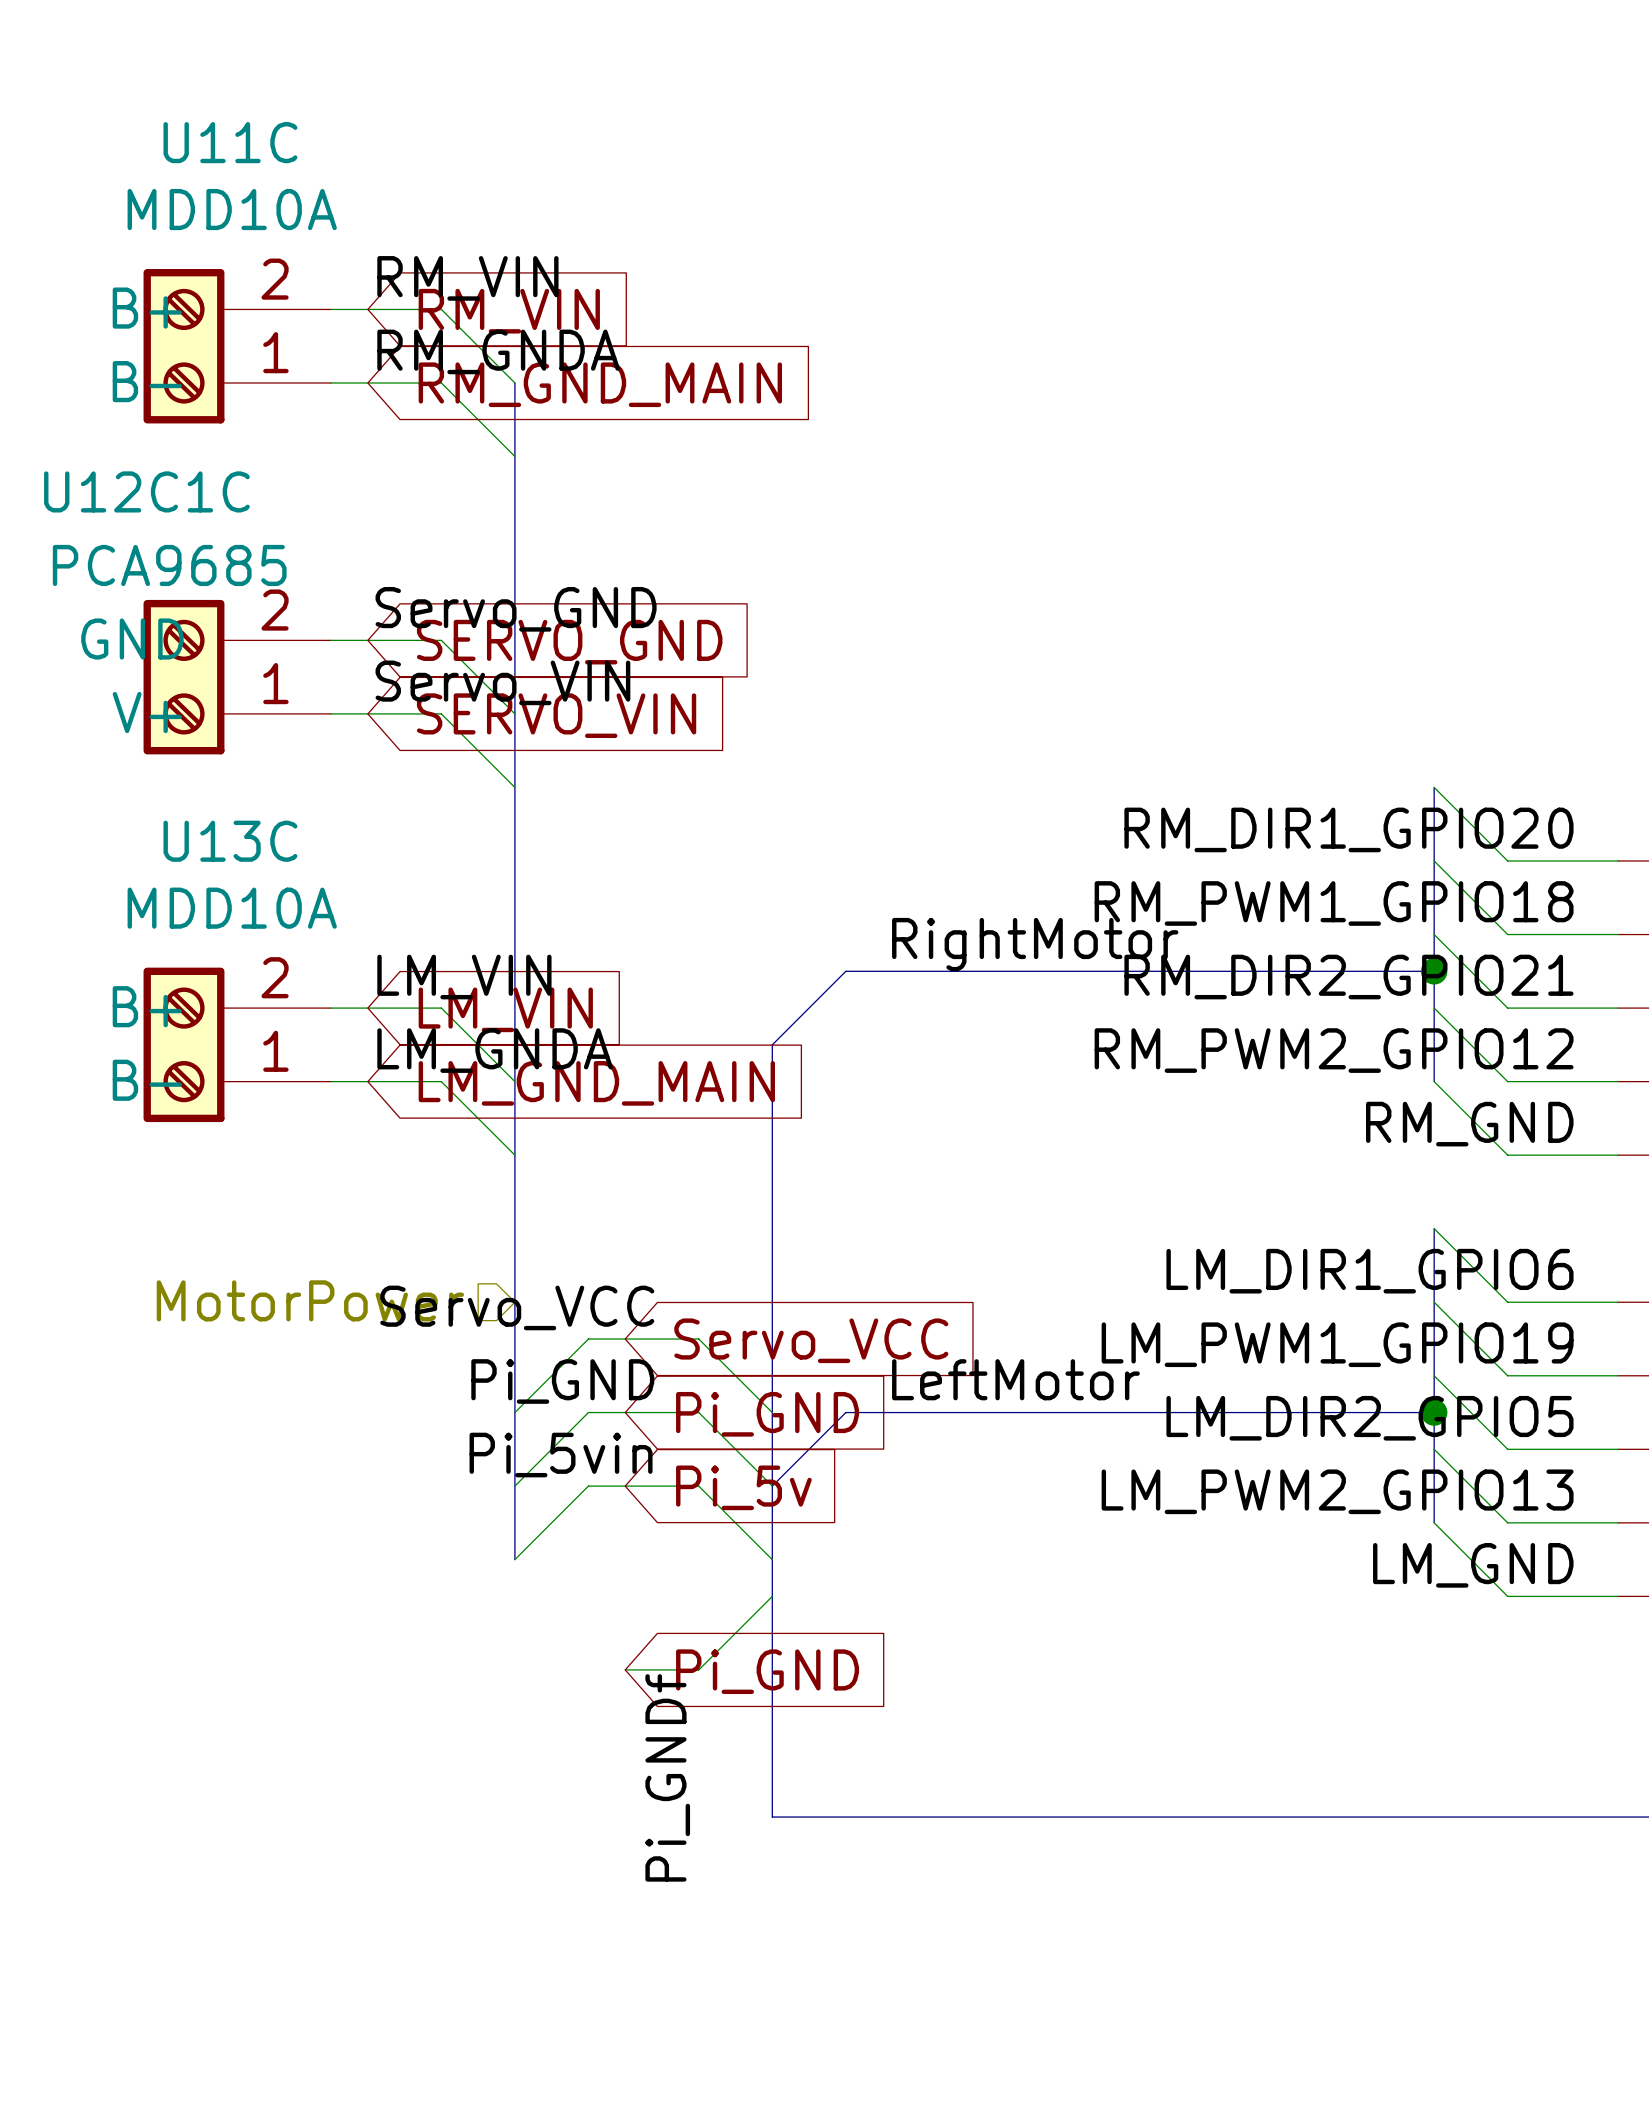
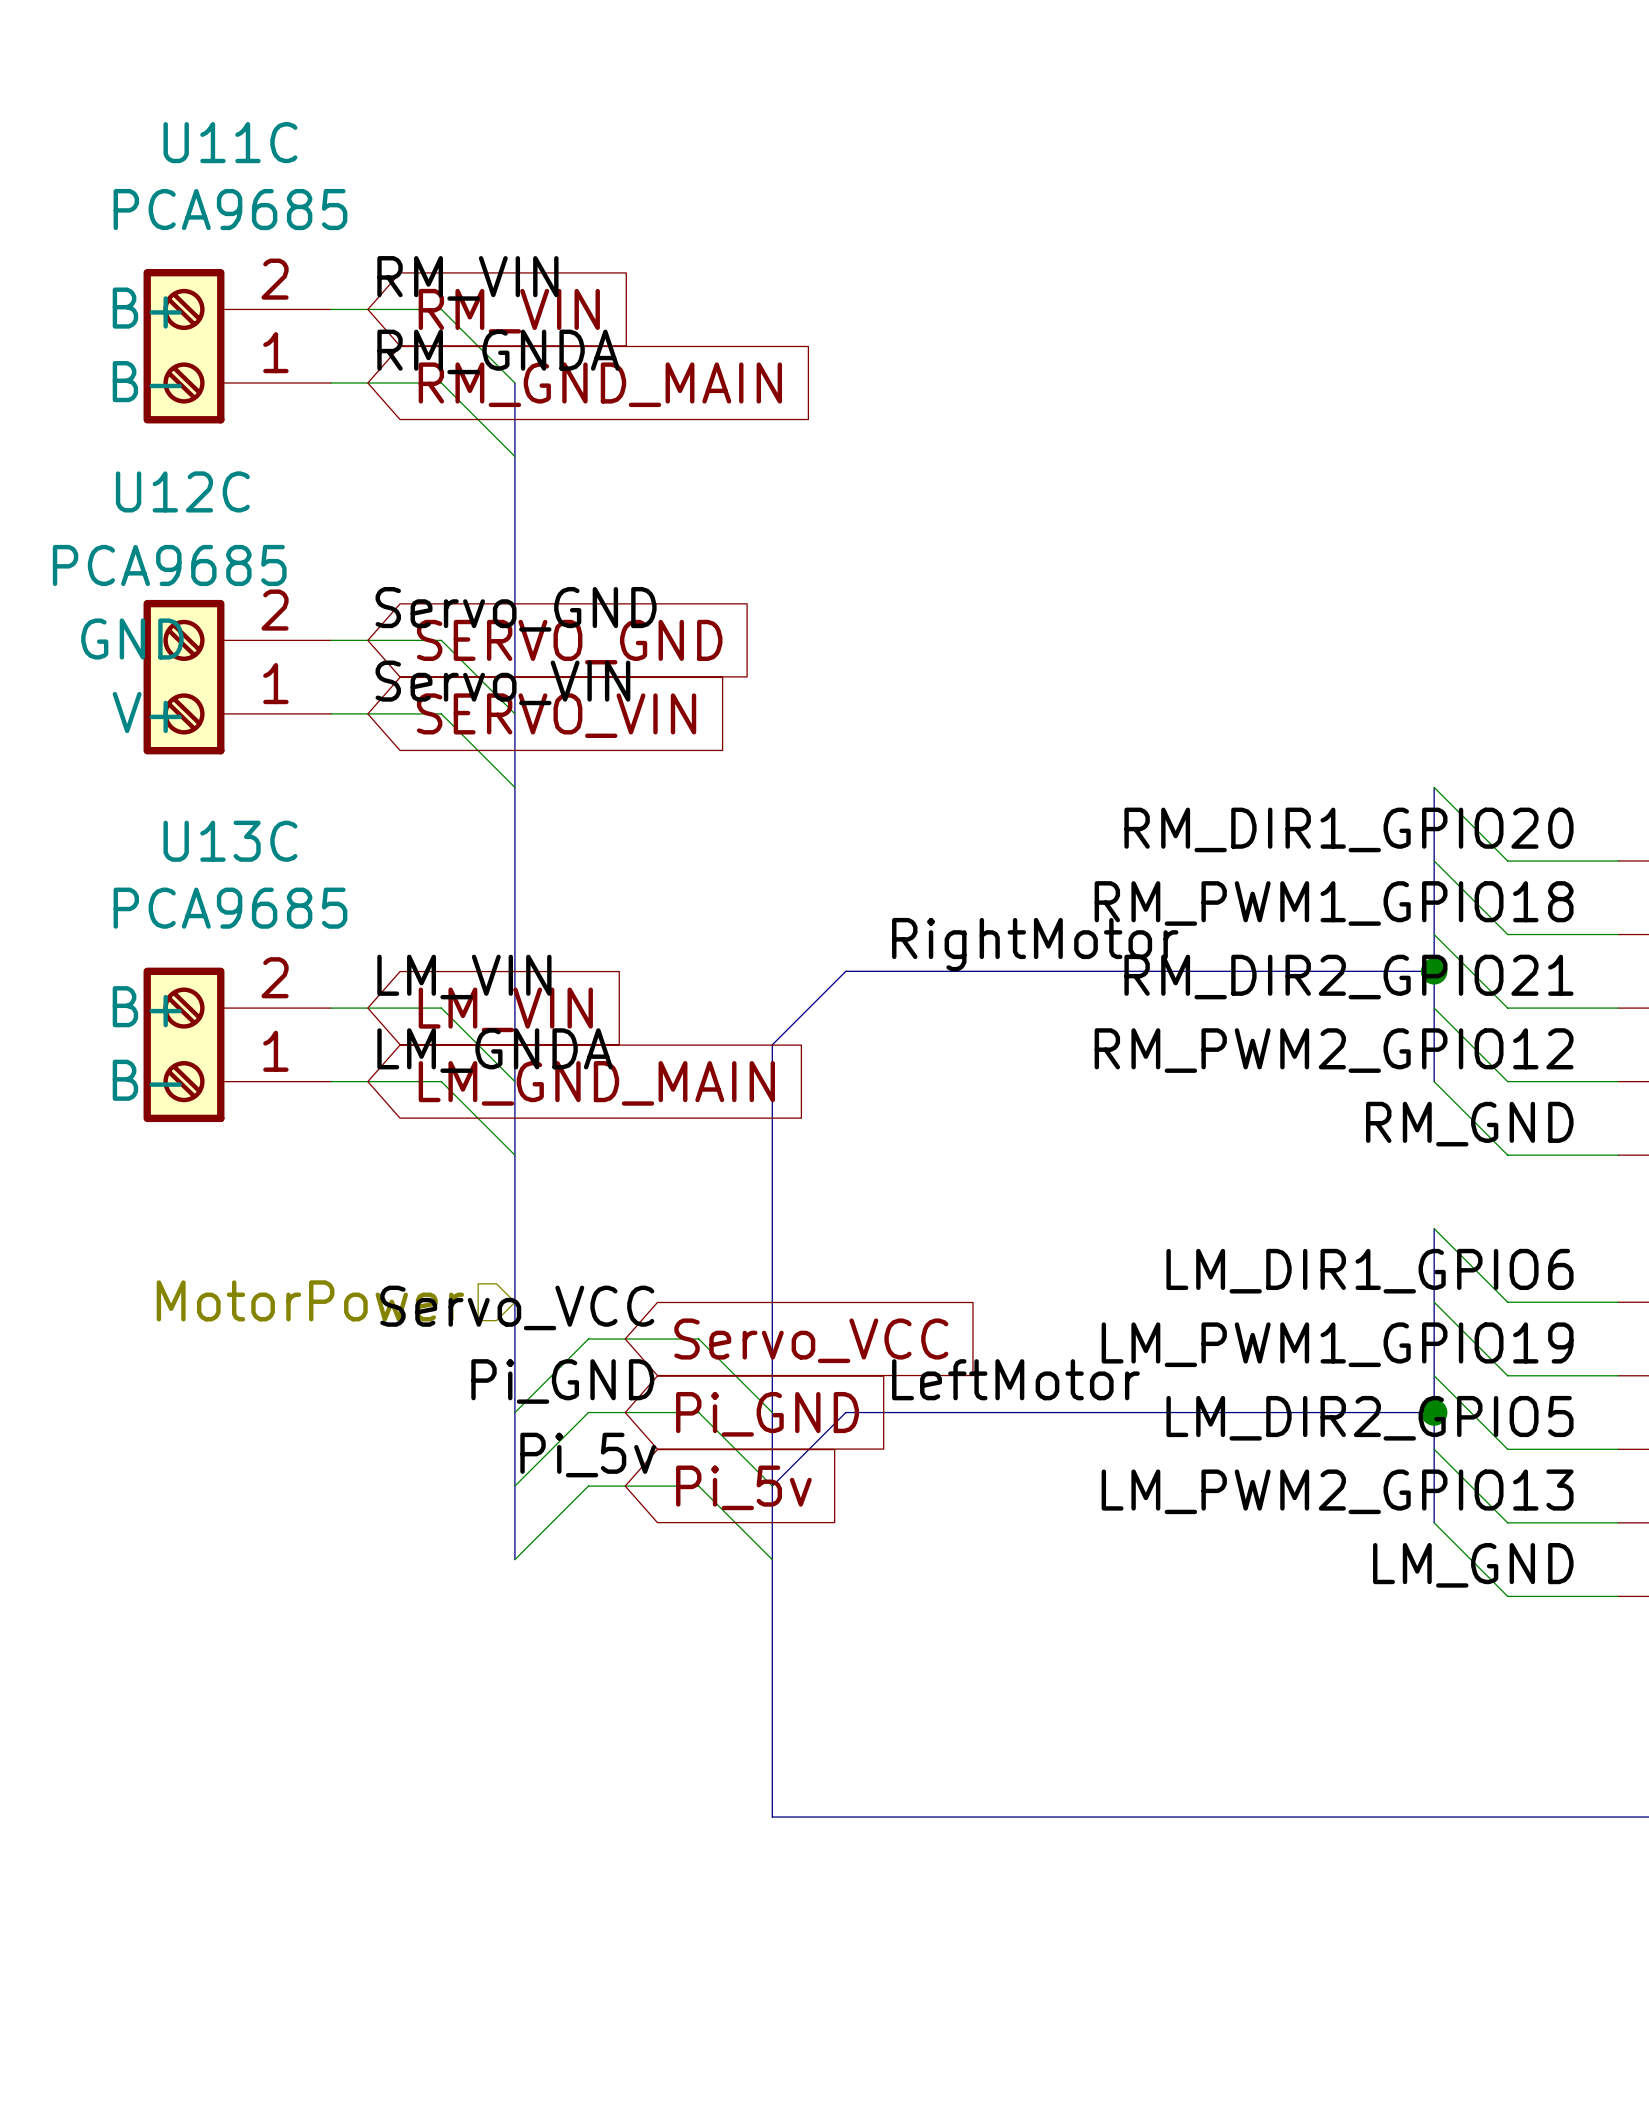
U11C value: MDD10A (232, 209) -> PCA9685 (230, 209)
U12C1C name: U12C1C (146, 491) -> U12C (182, 491)
U13C value: MDD10A (232, 908) -> PCA9685 (230, 908)
label: Pi_5vin (561, 1455) -> Pi_5v (588, 1455)
wire: (772, 1596) (698, 1669) (625, 1669) -> none
global label: Pi_GND (767, 1671) -> none
label: Pi_GNDf (667, 1777) -> none

